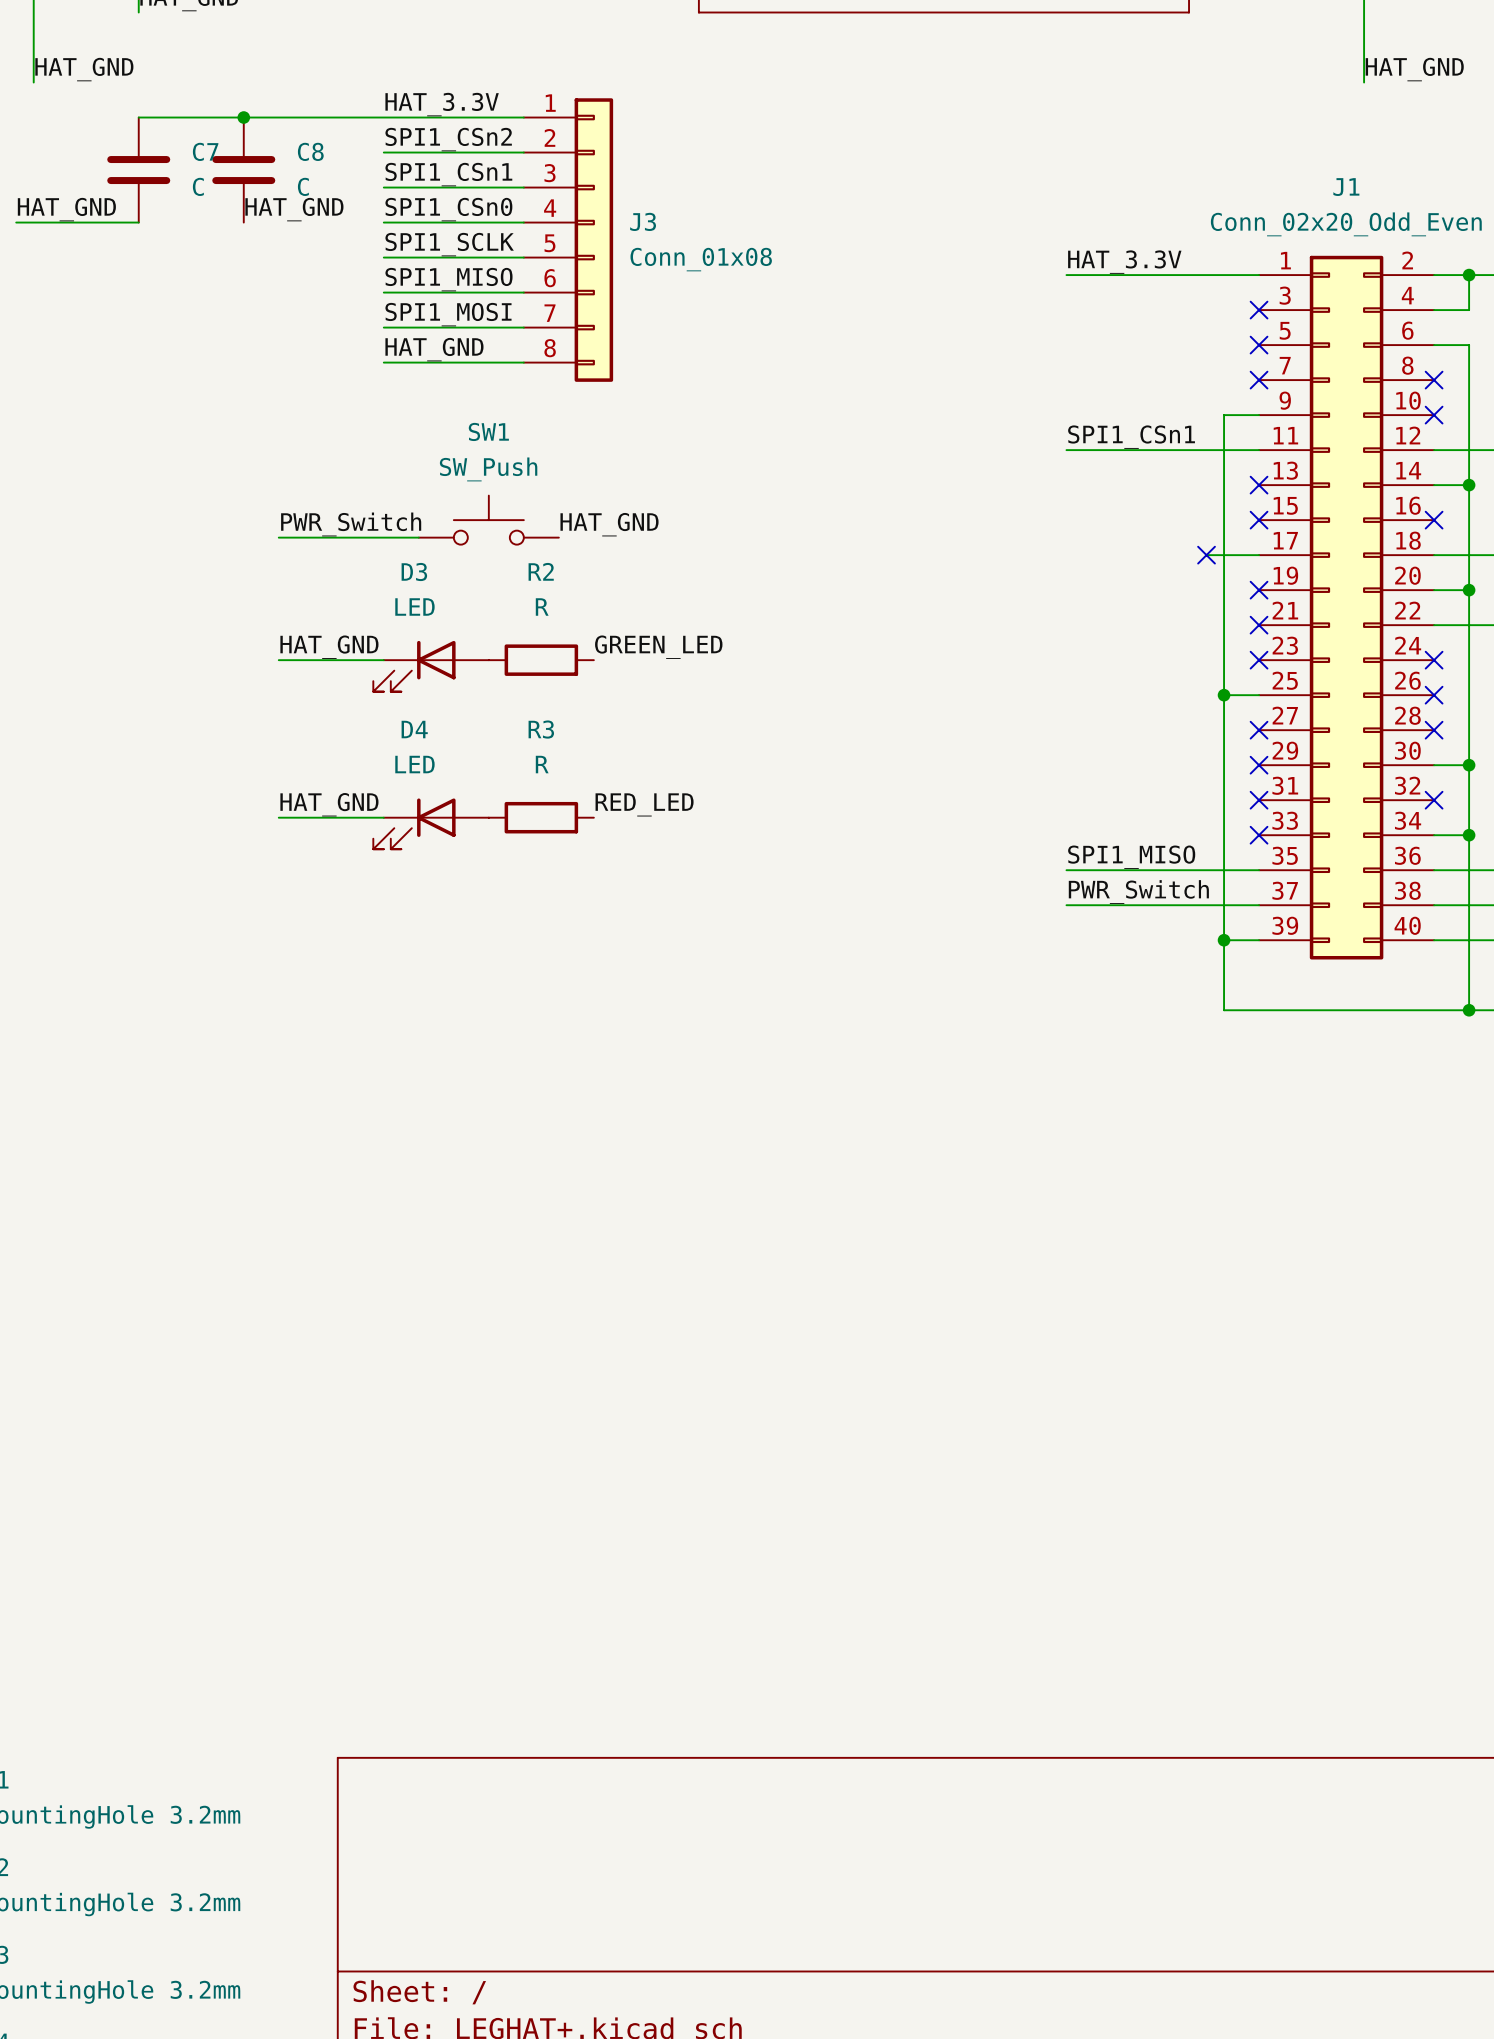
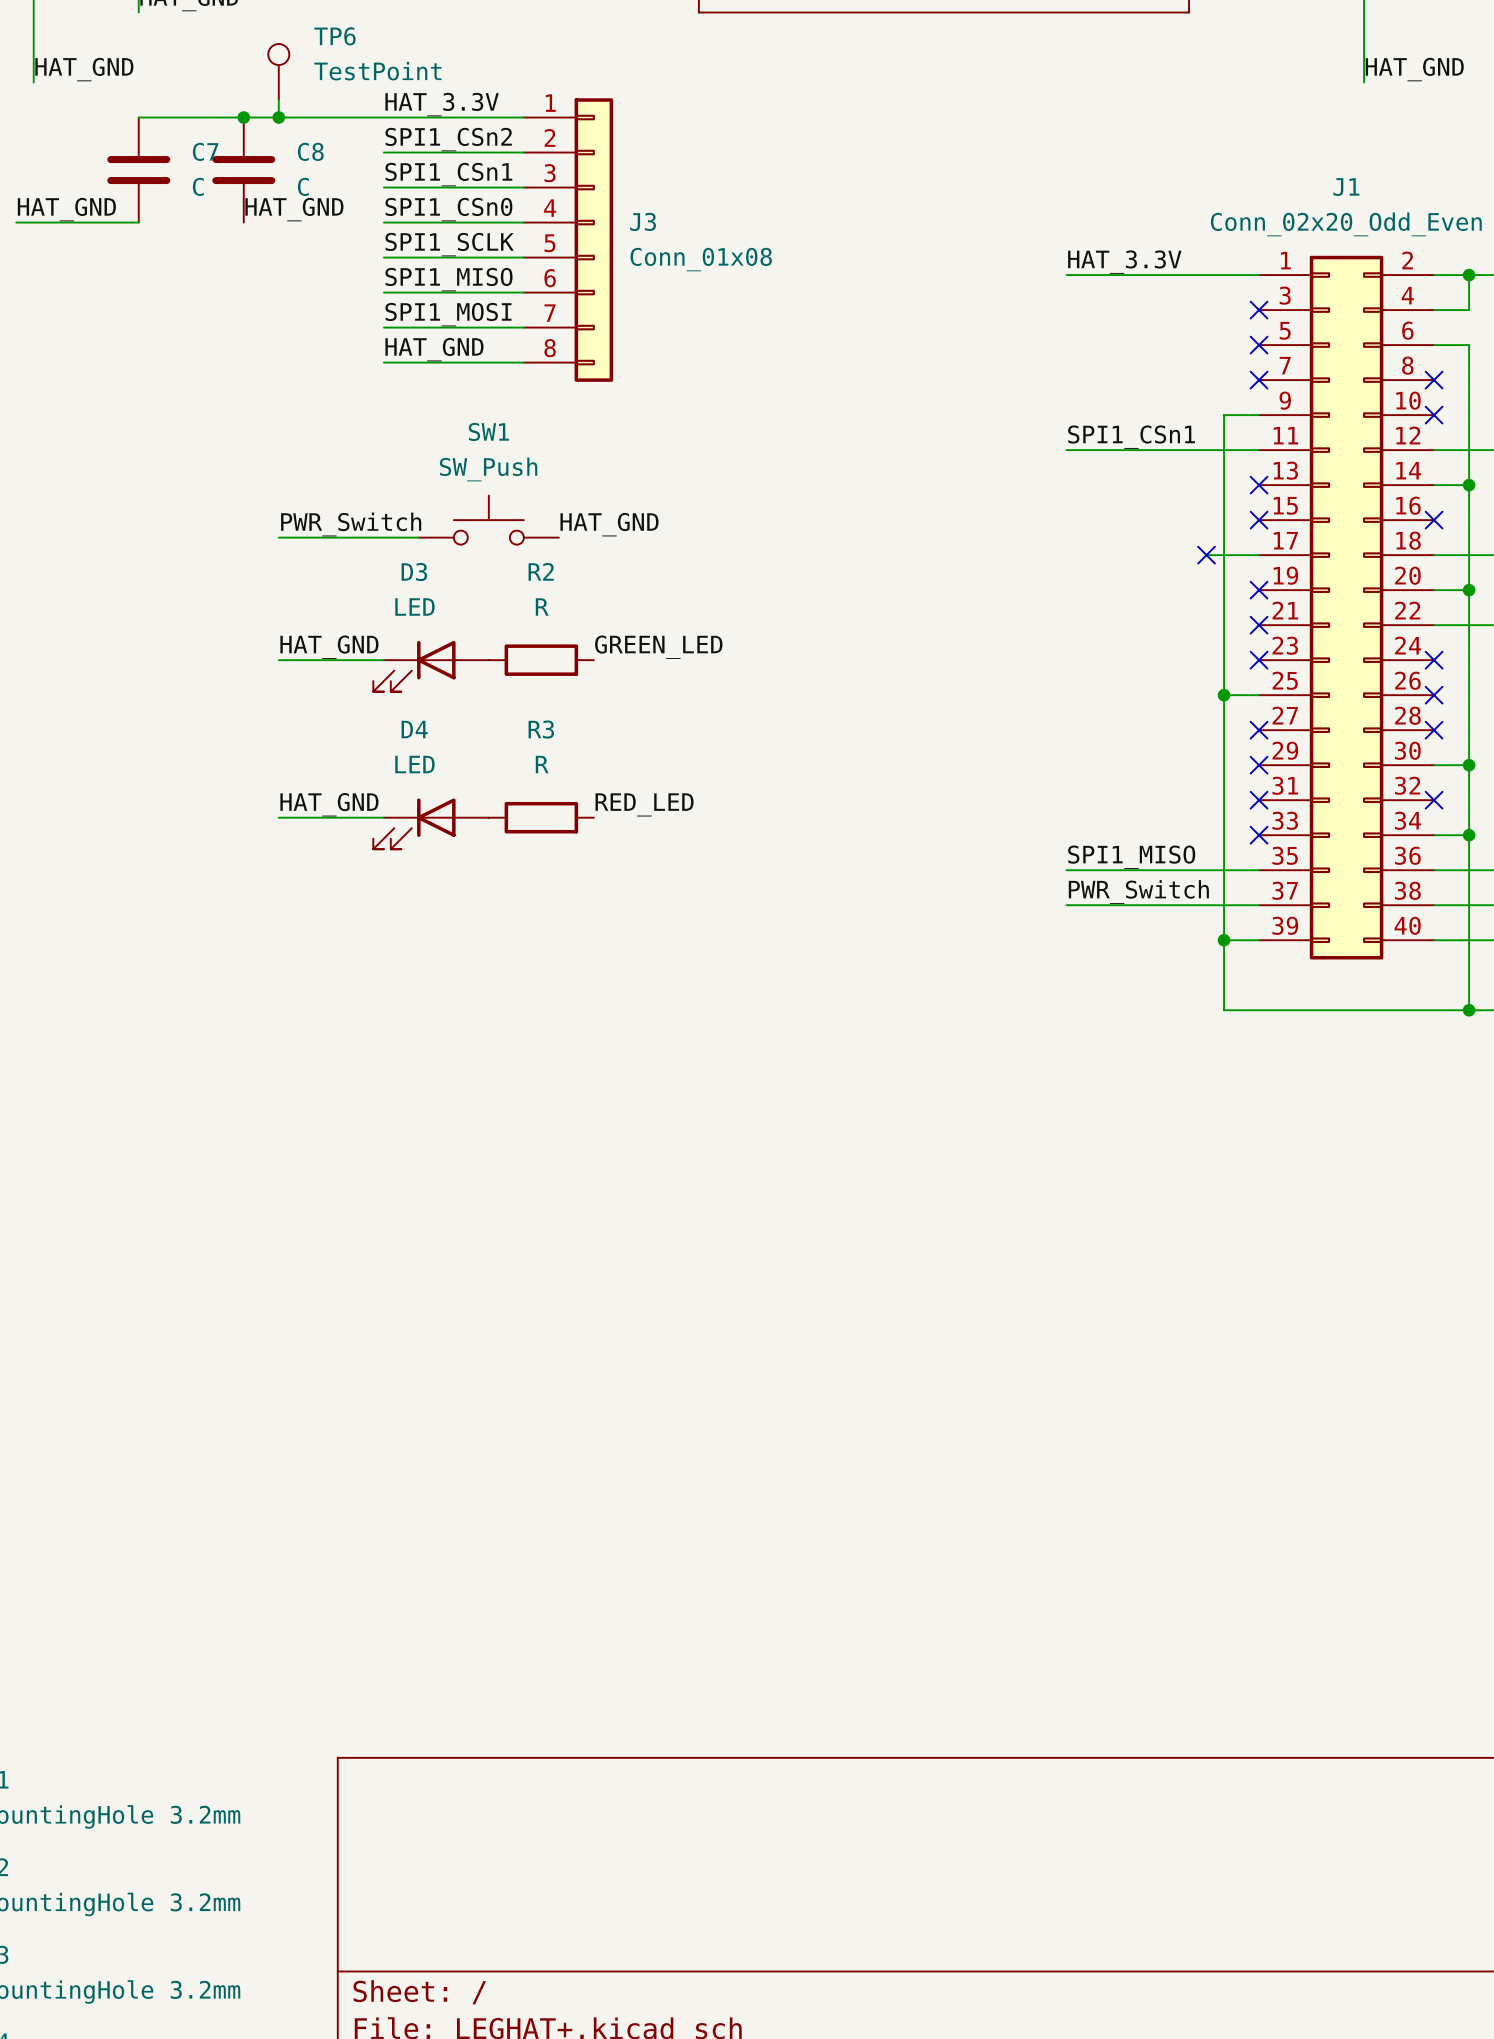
TP6: none -> TestPoint (278, 72)
wire: none -> (278, 100) (278, 117)
junction: none -> (278, 117)

